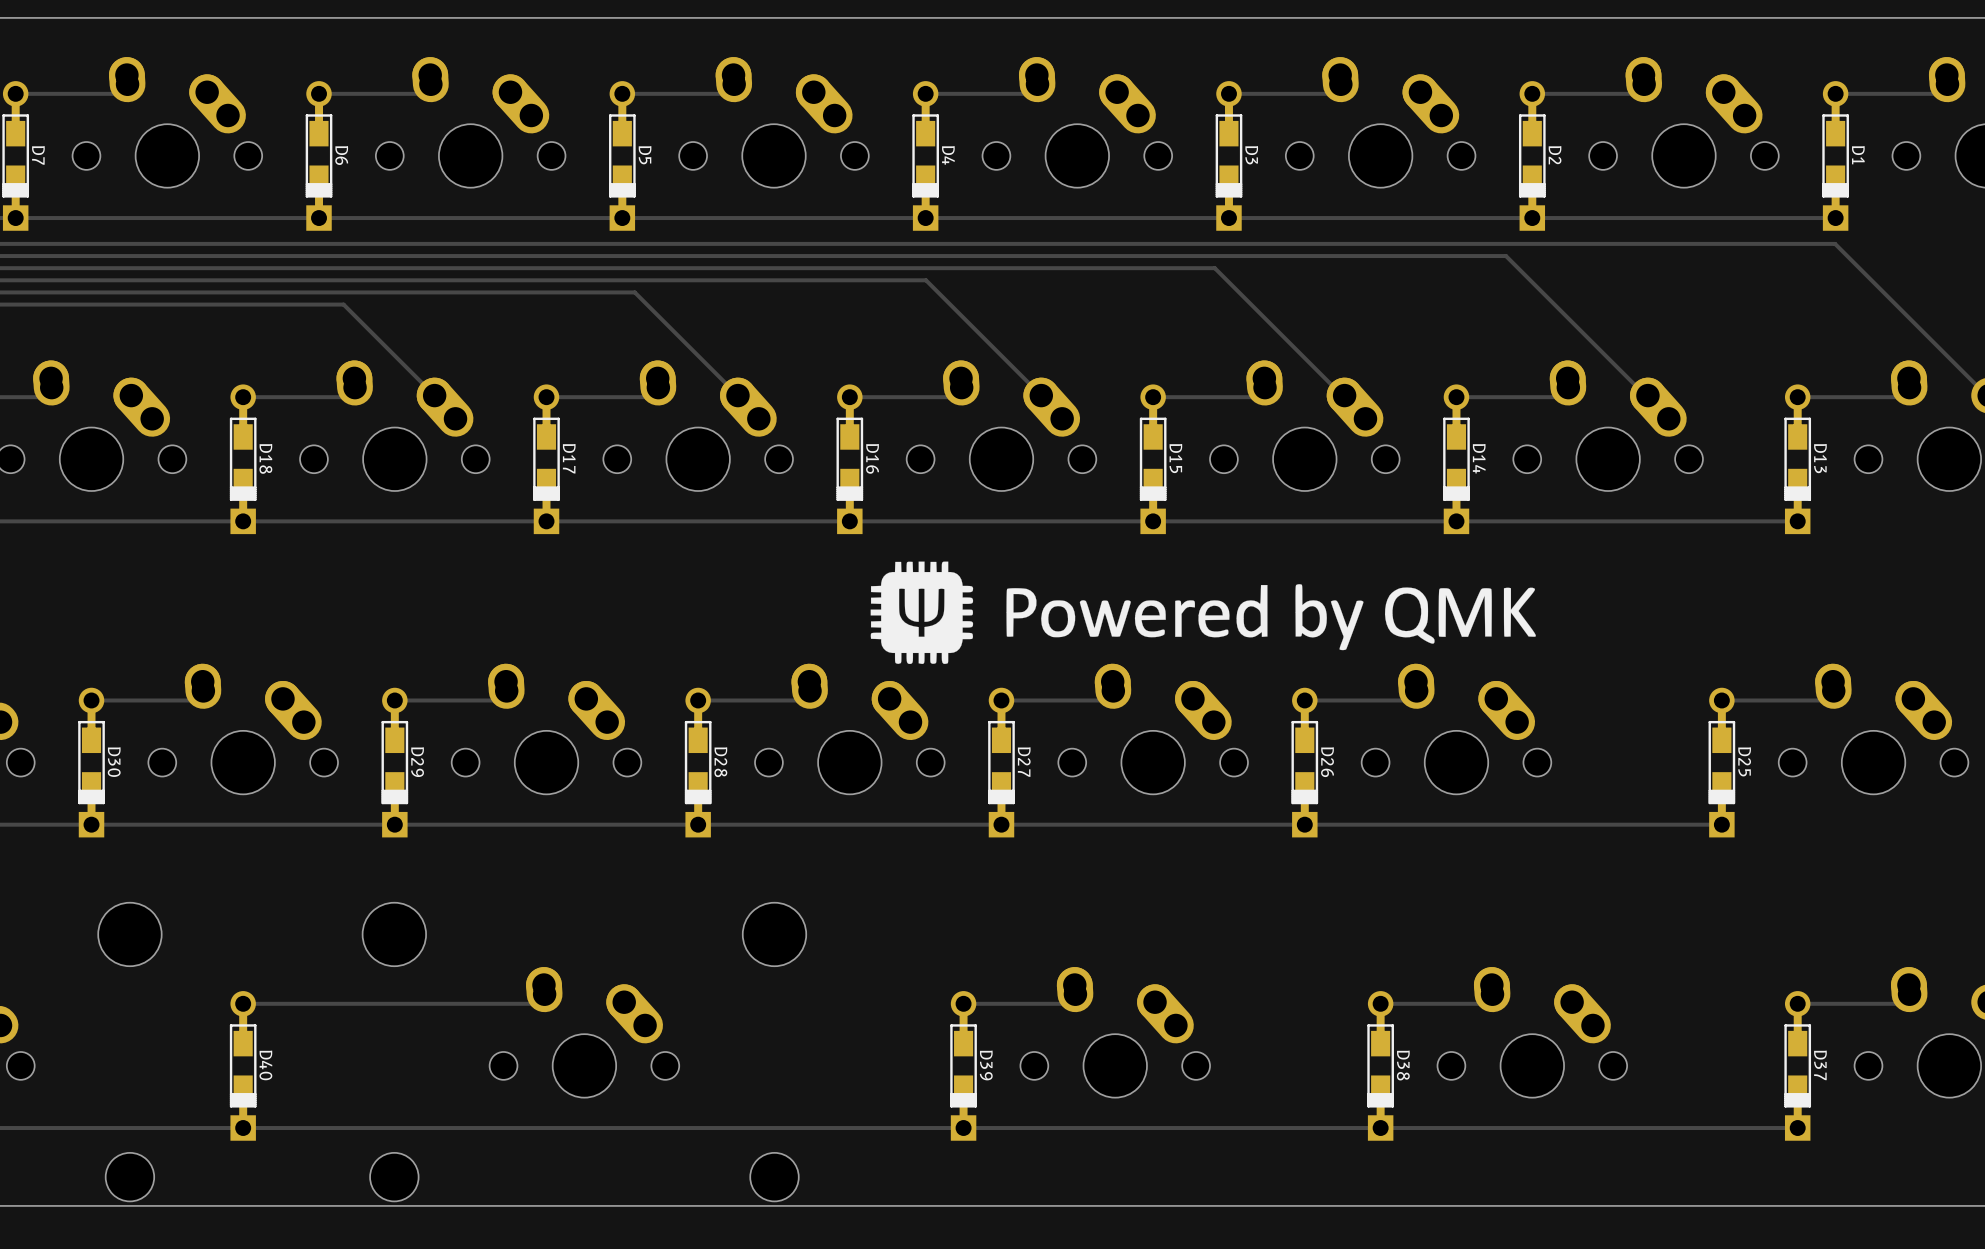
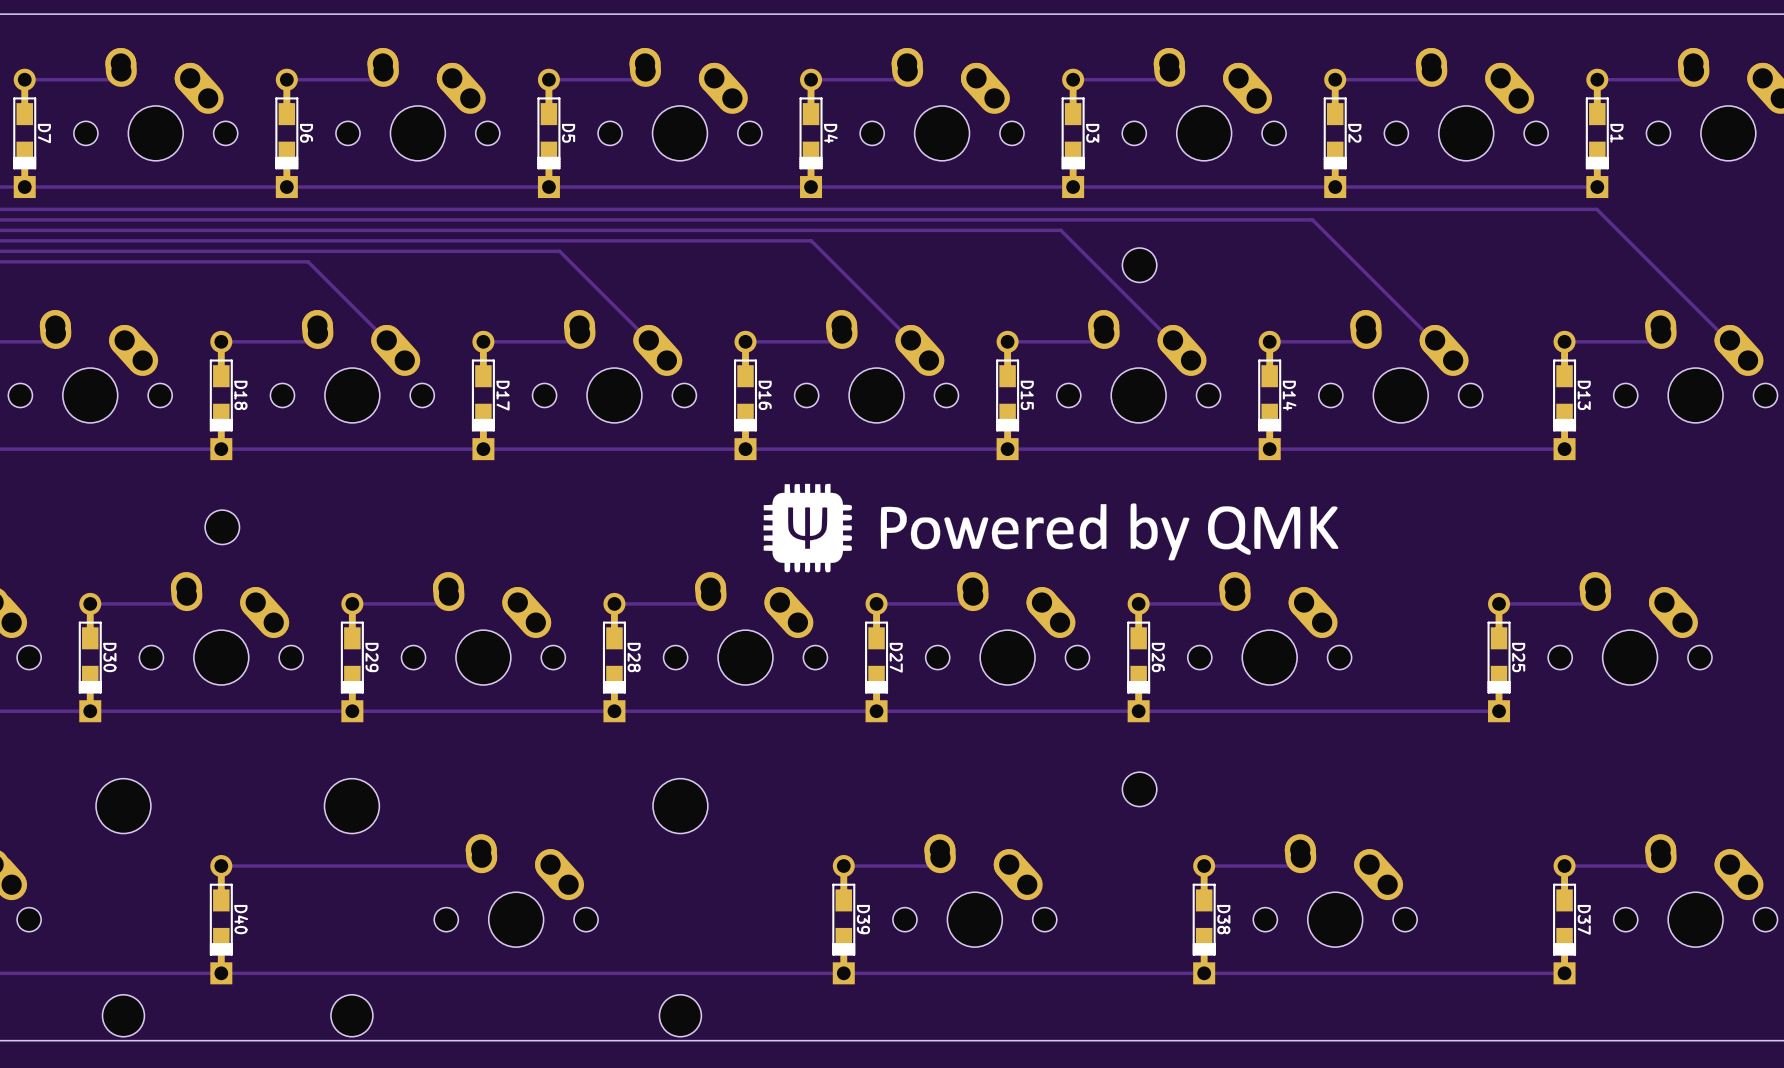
part: none -> (1139, 265)
part: none -> (222, 527)
part: none -> (1139, 789)

